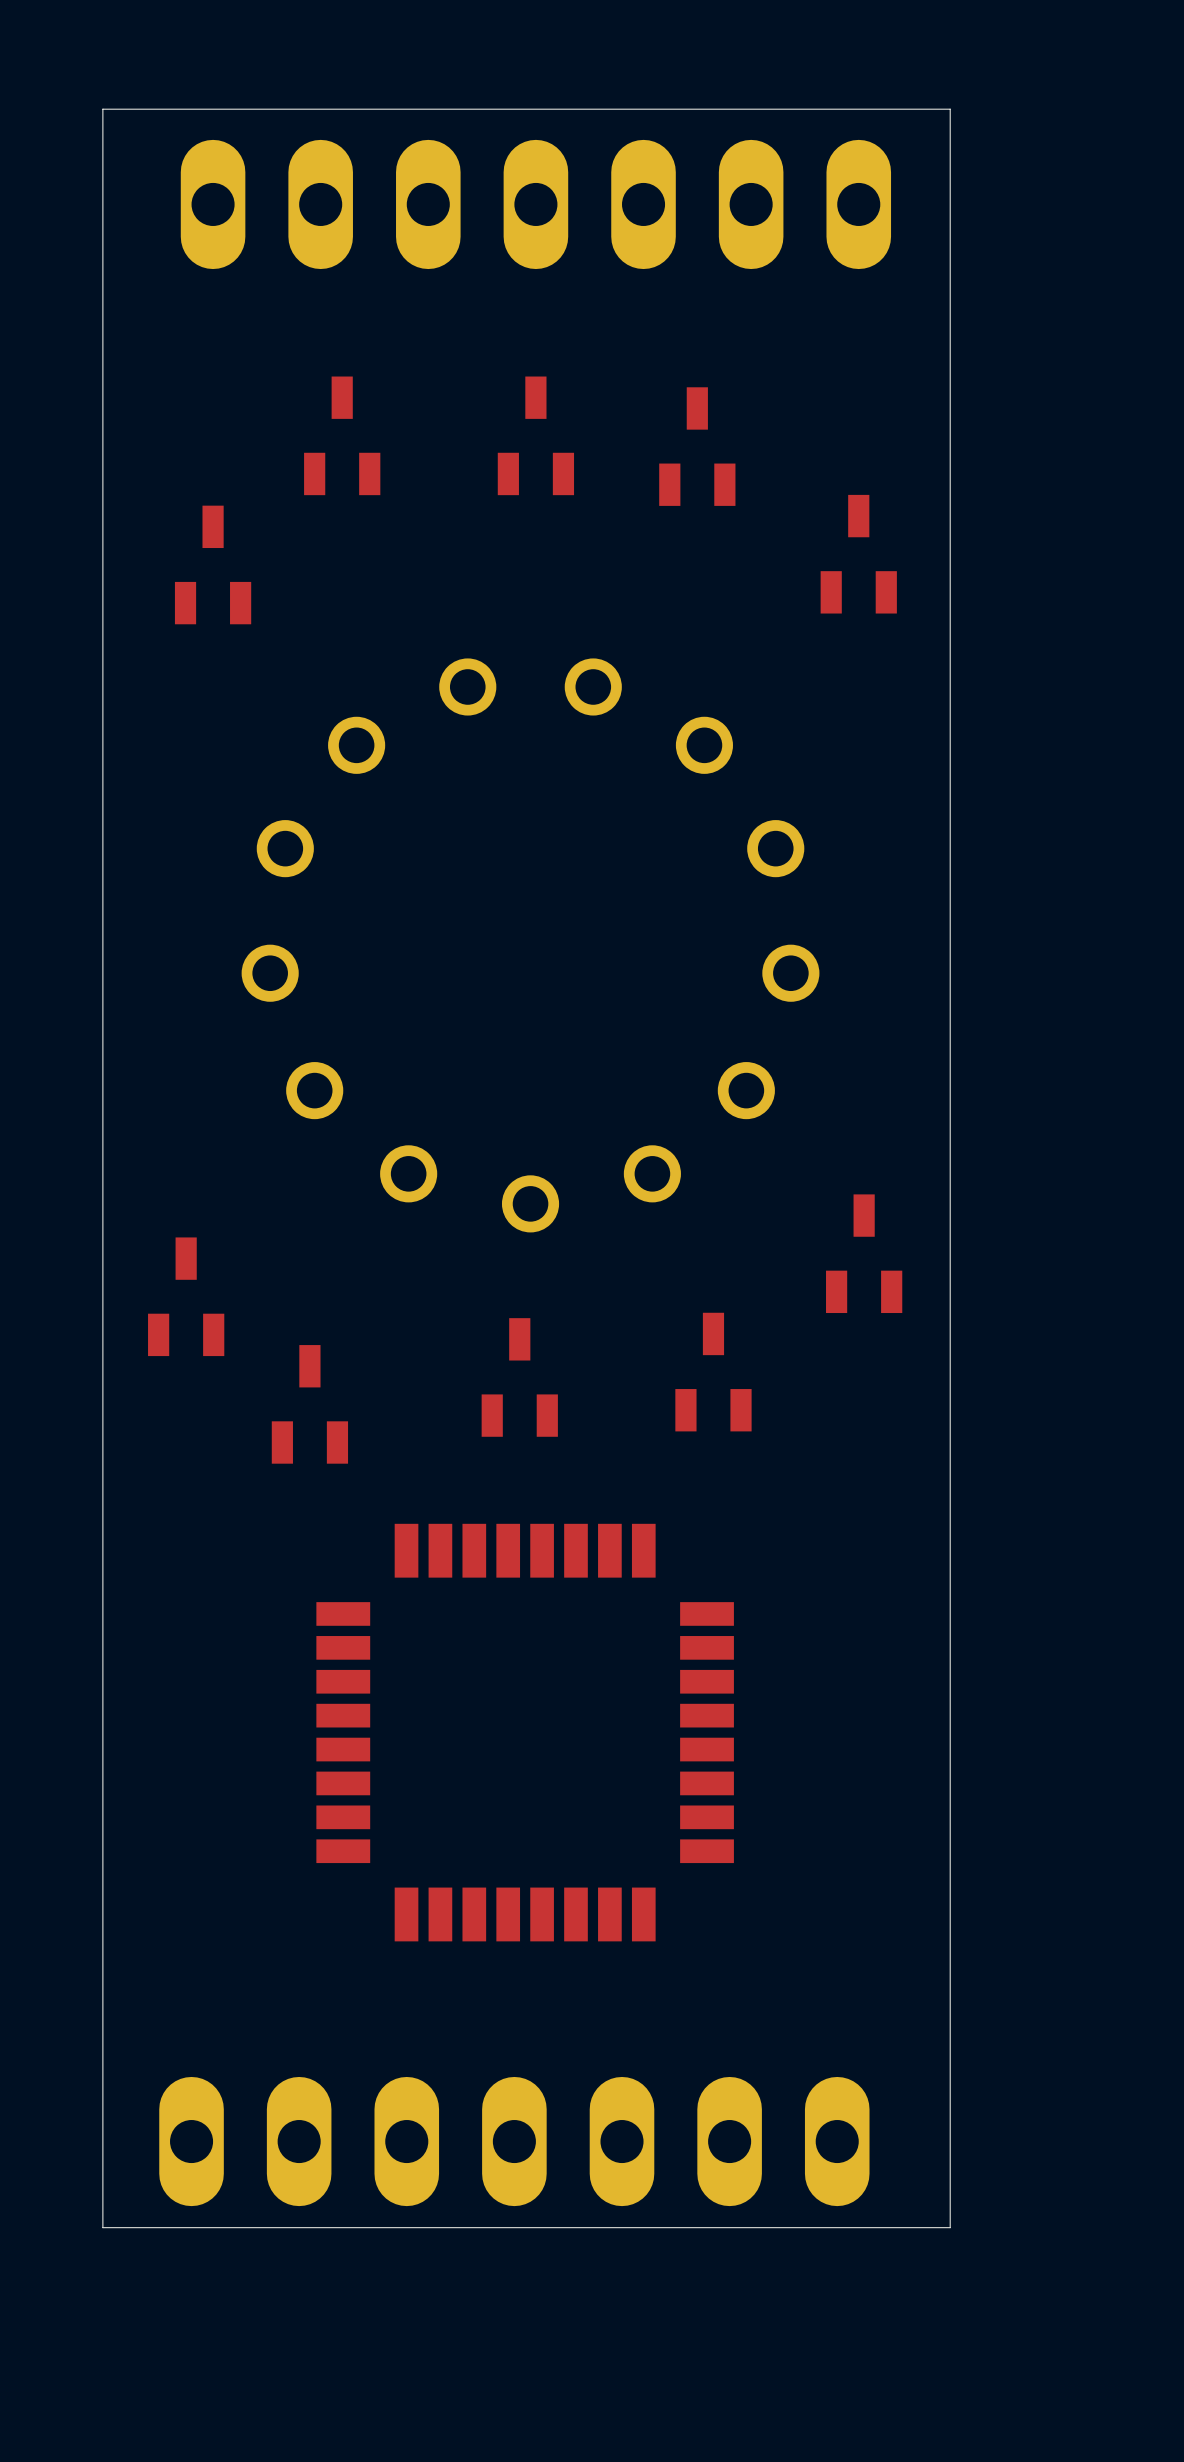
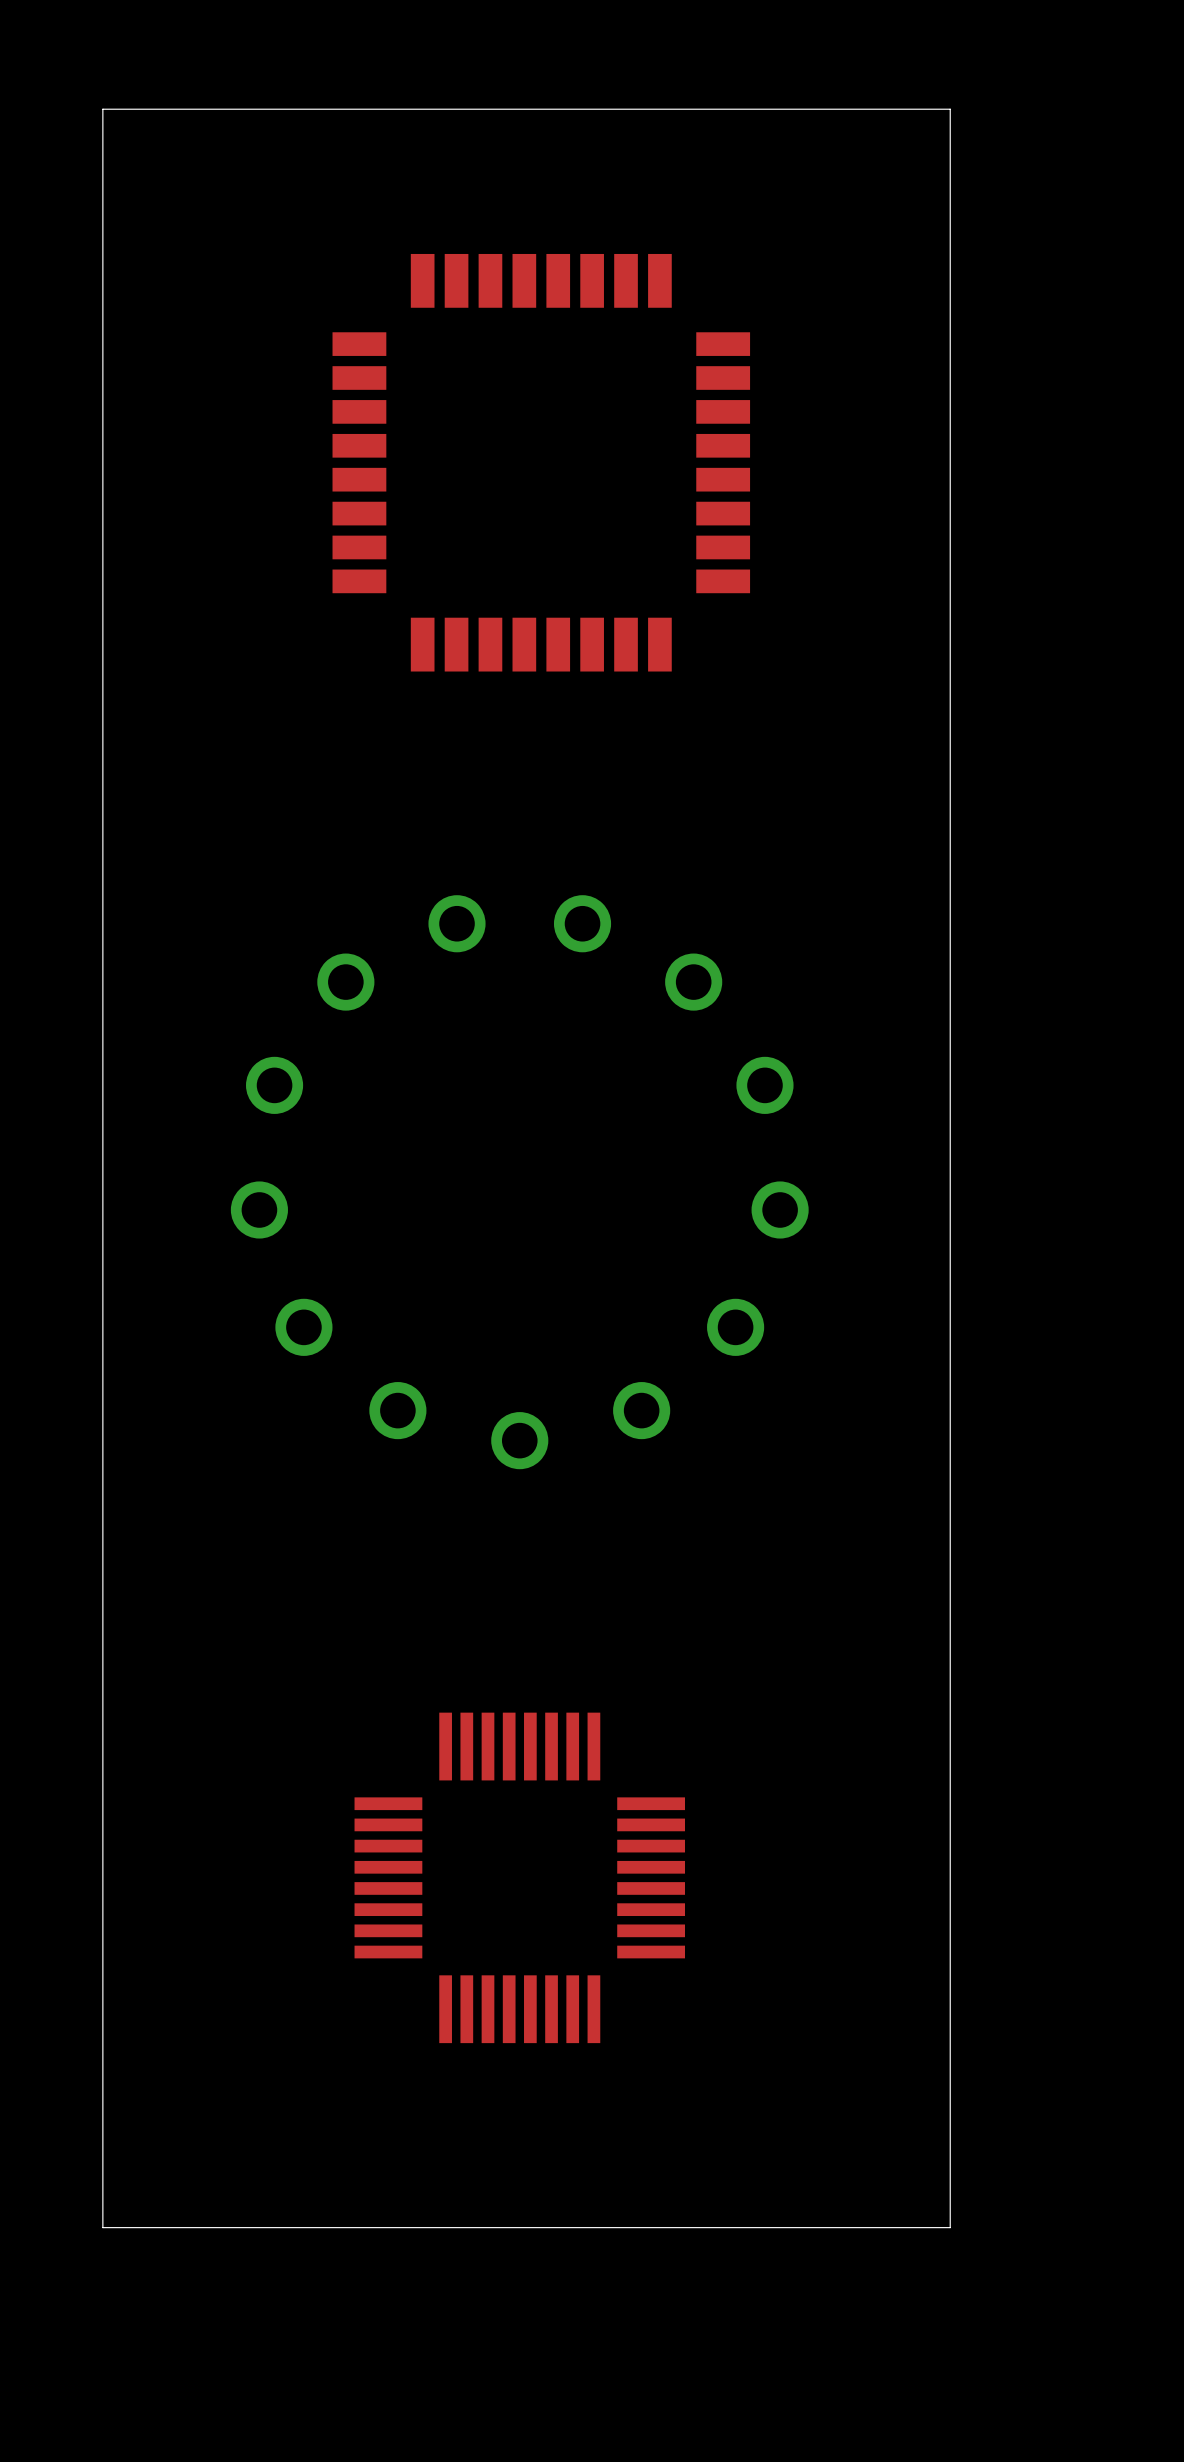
part: (535, 204) -> none
part footprint: [497, 376, 575, 496] -> [332, 253, 751, 672]
part: (342, 435) -> none
part: (697, 446) -> none
part: (858, 554) -> none
part: (213, 564) -> none
part position: (530, 945) -> (519, 1182)
part: (864, 1253) -> none
part: (186, 1296) -> none
part: (713, 1372) -> none
part: (519, 1377) -> none
part: (309, 1404) -> none
part: (525, 1732) -> none
part: none -> (519, 1877)
part: (514, 2141) -> none

